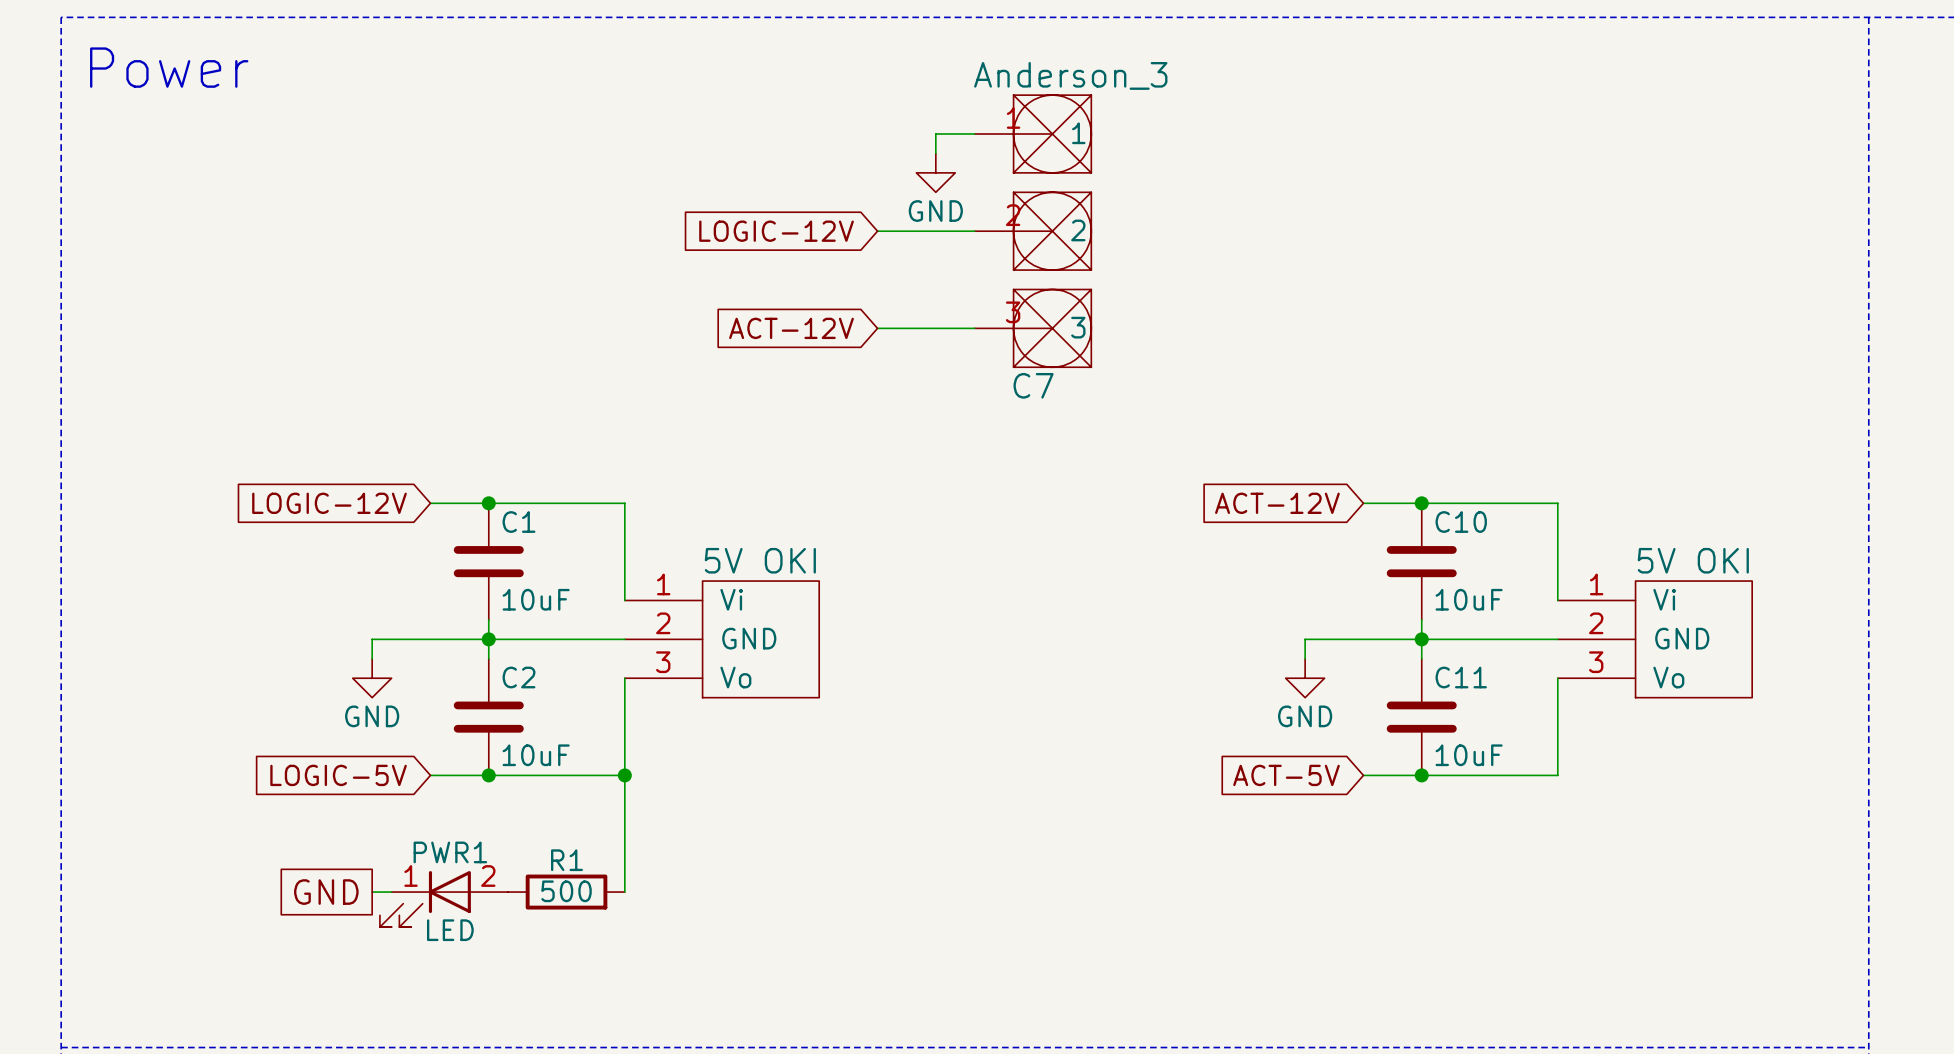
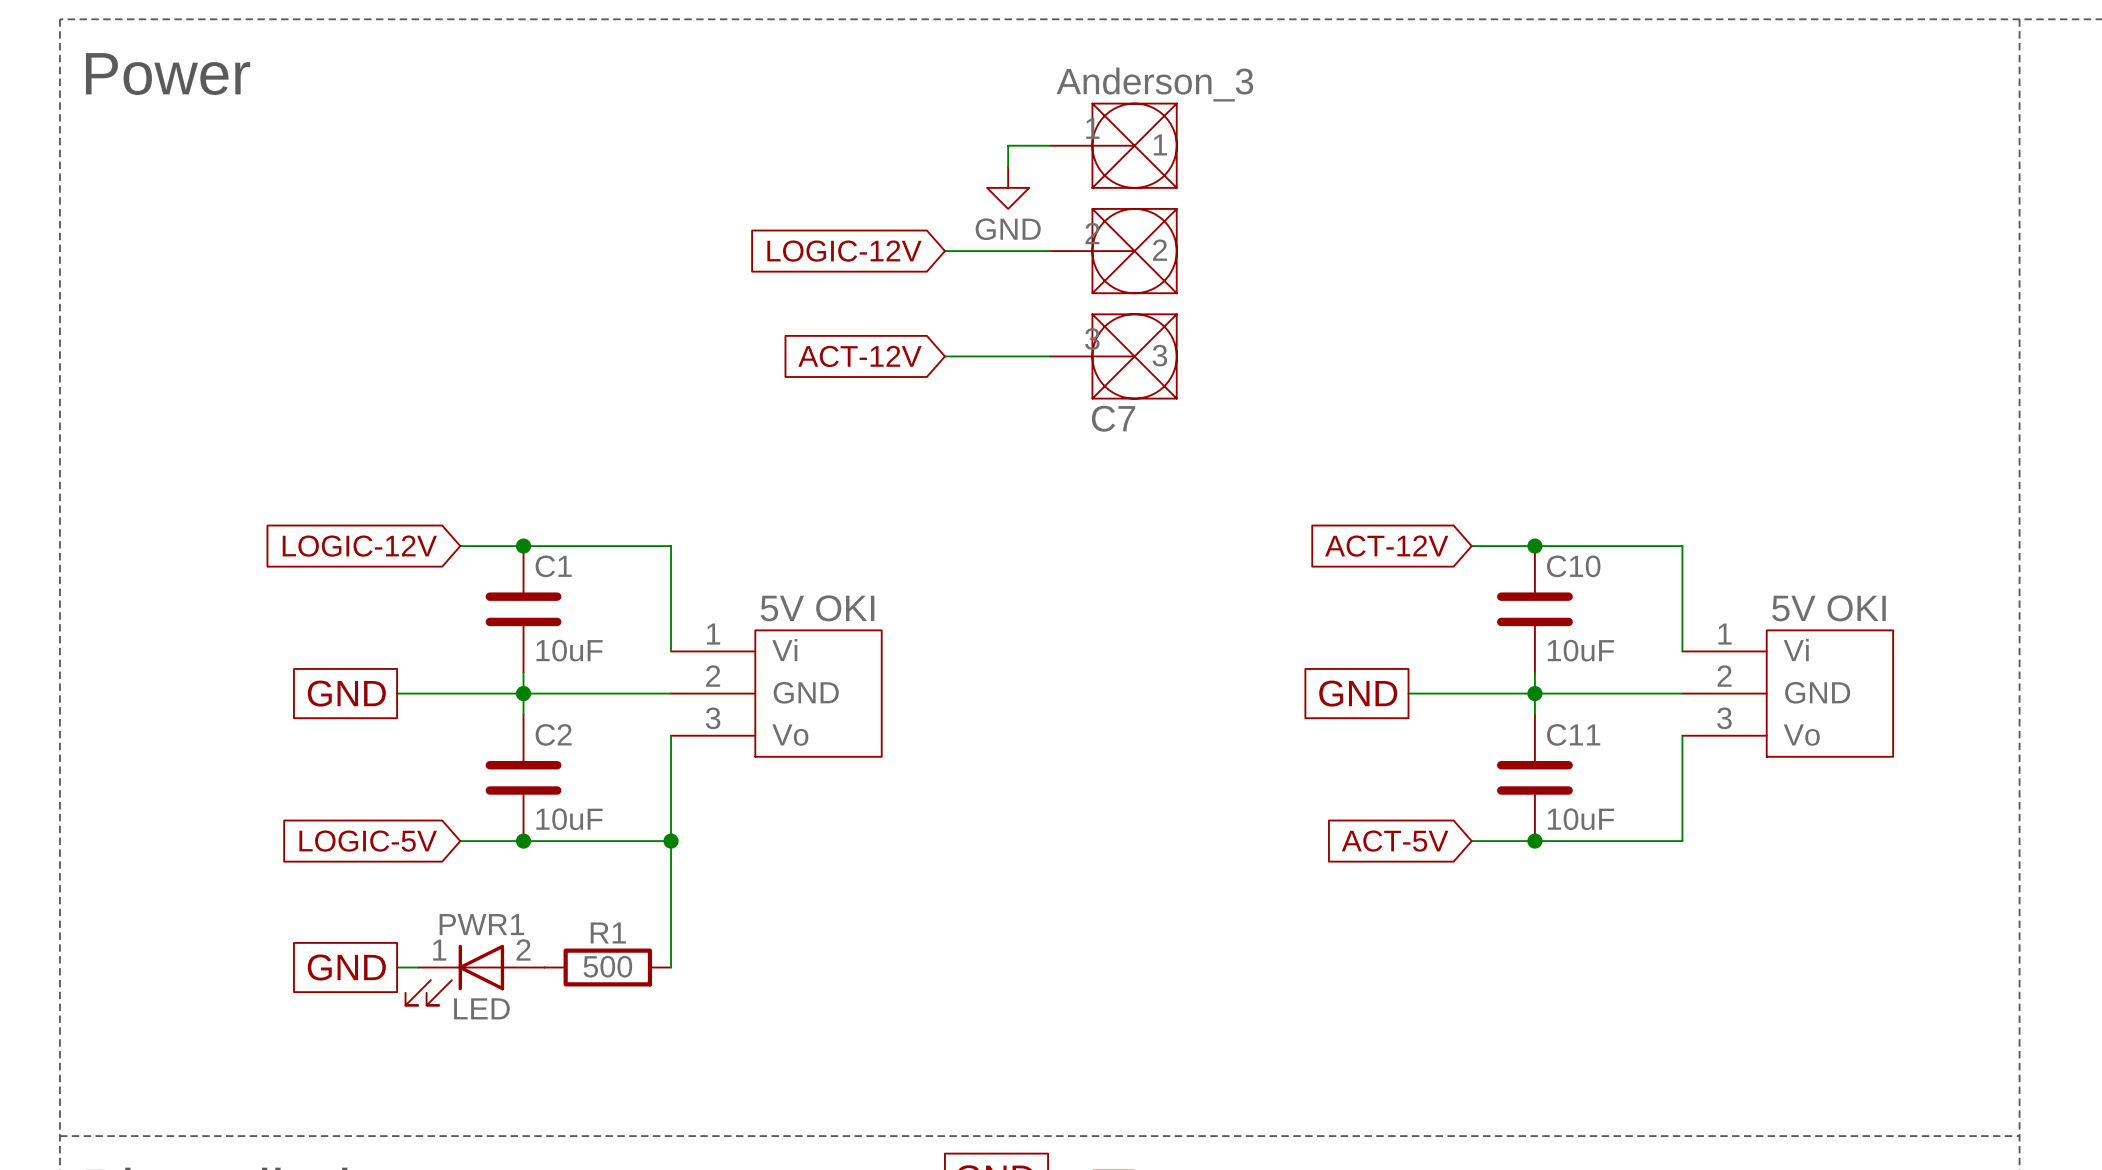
global label: none -> GND (346, 693)
global label: none -> GND (1358, 693)
power symbol: GND (372, 678) -> none
power symbol: GND (1305, 678) -> none

